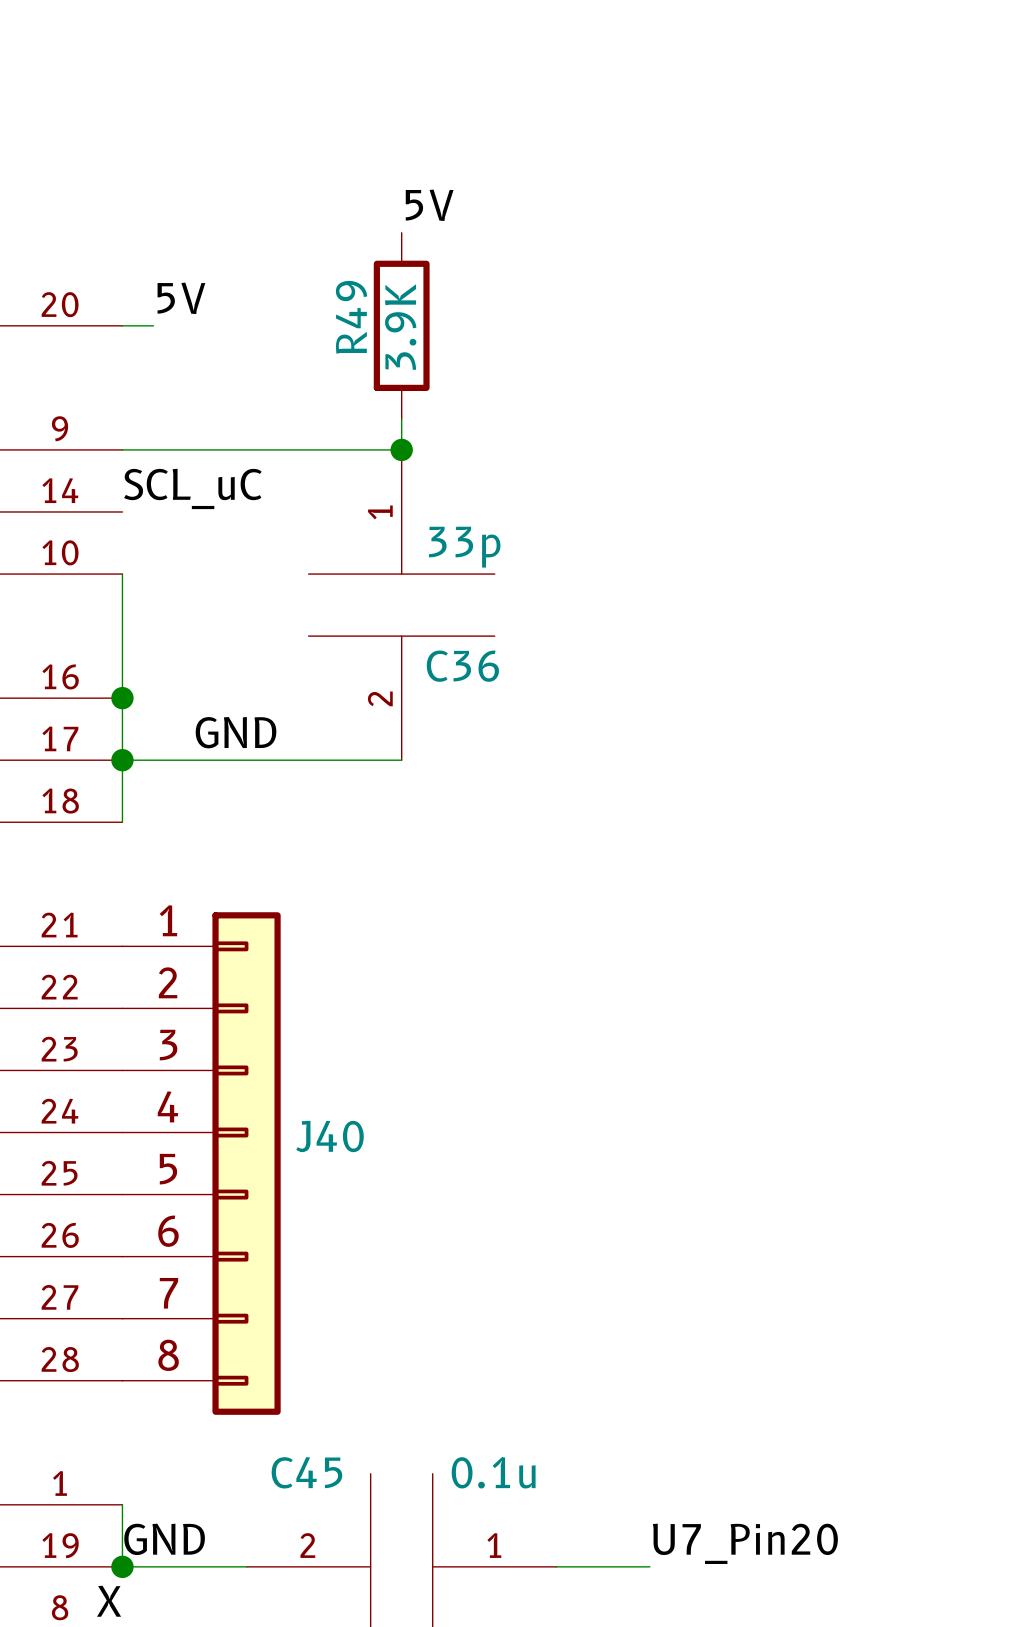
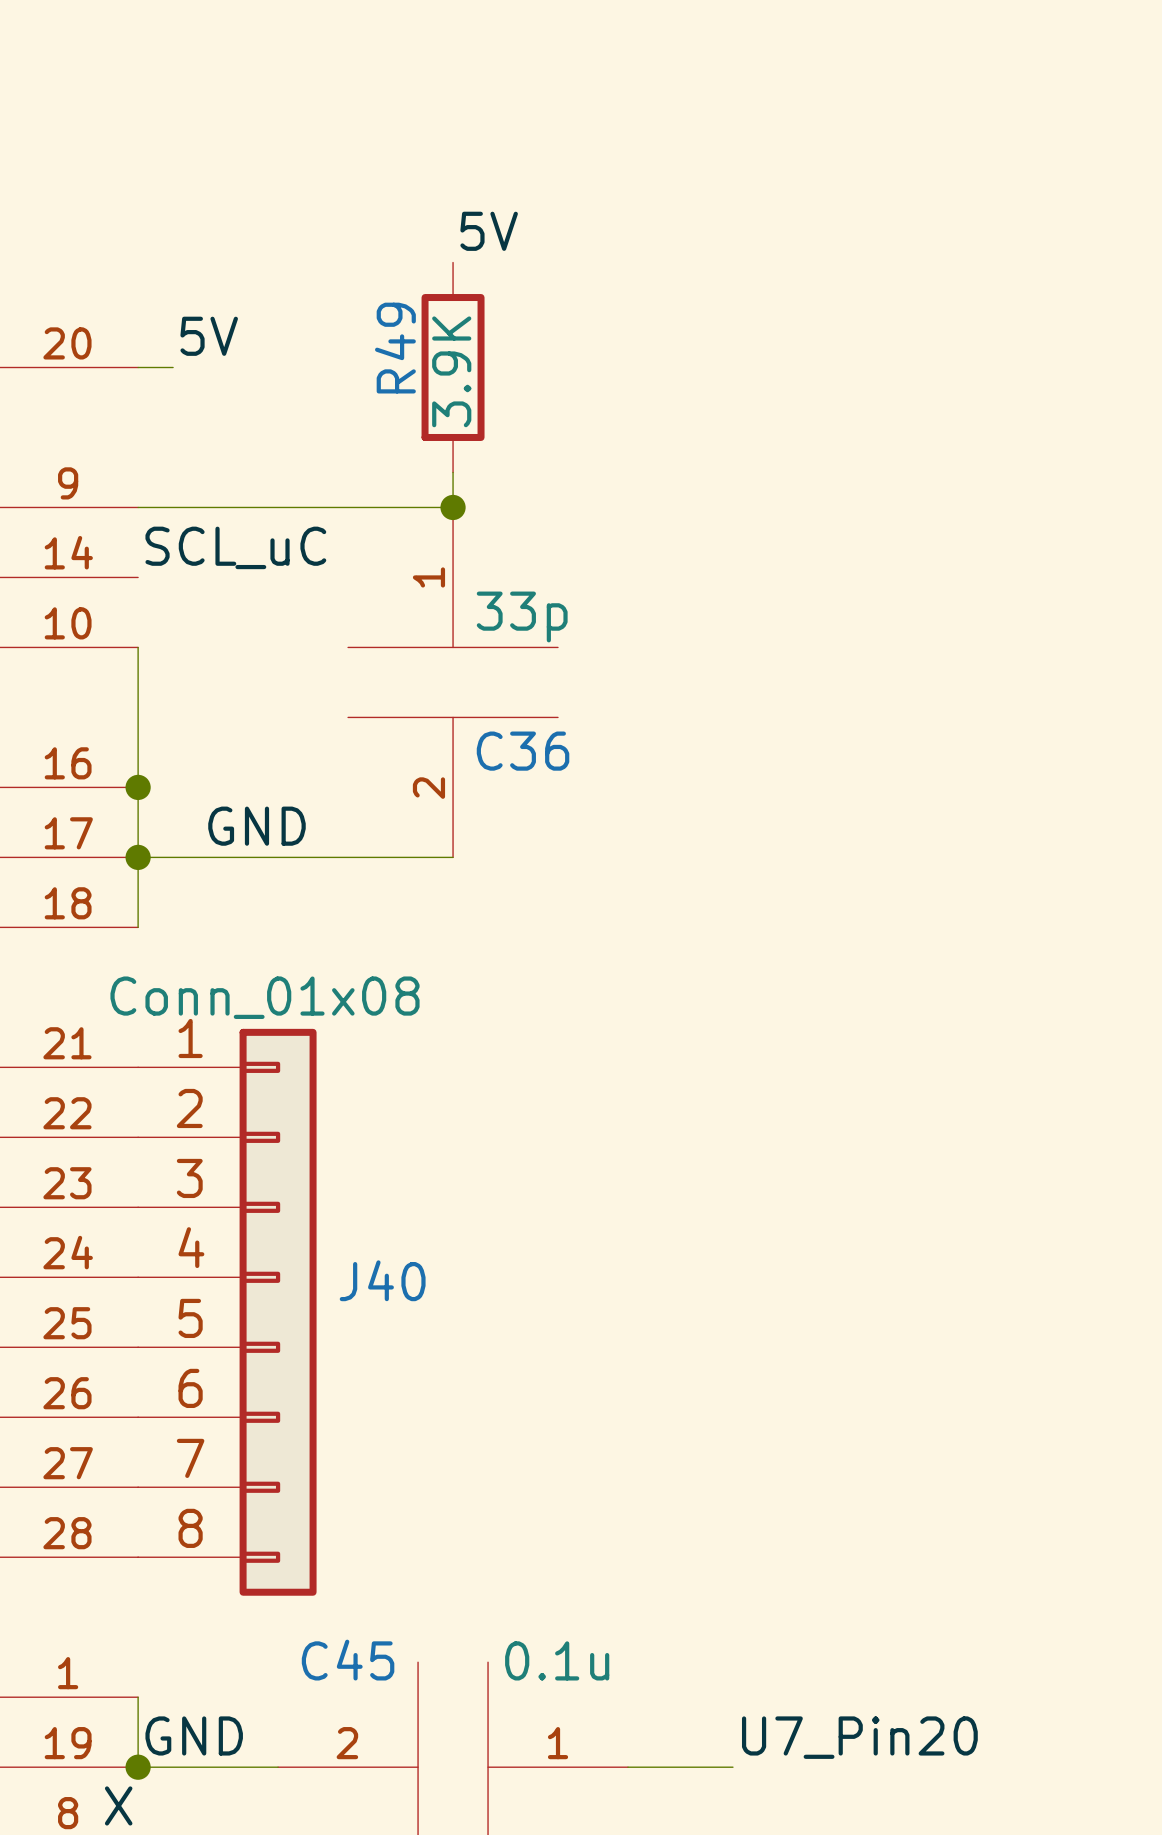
J40 value: none -> Conn_01x08 (265, 997)

